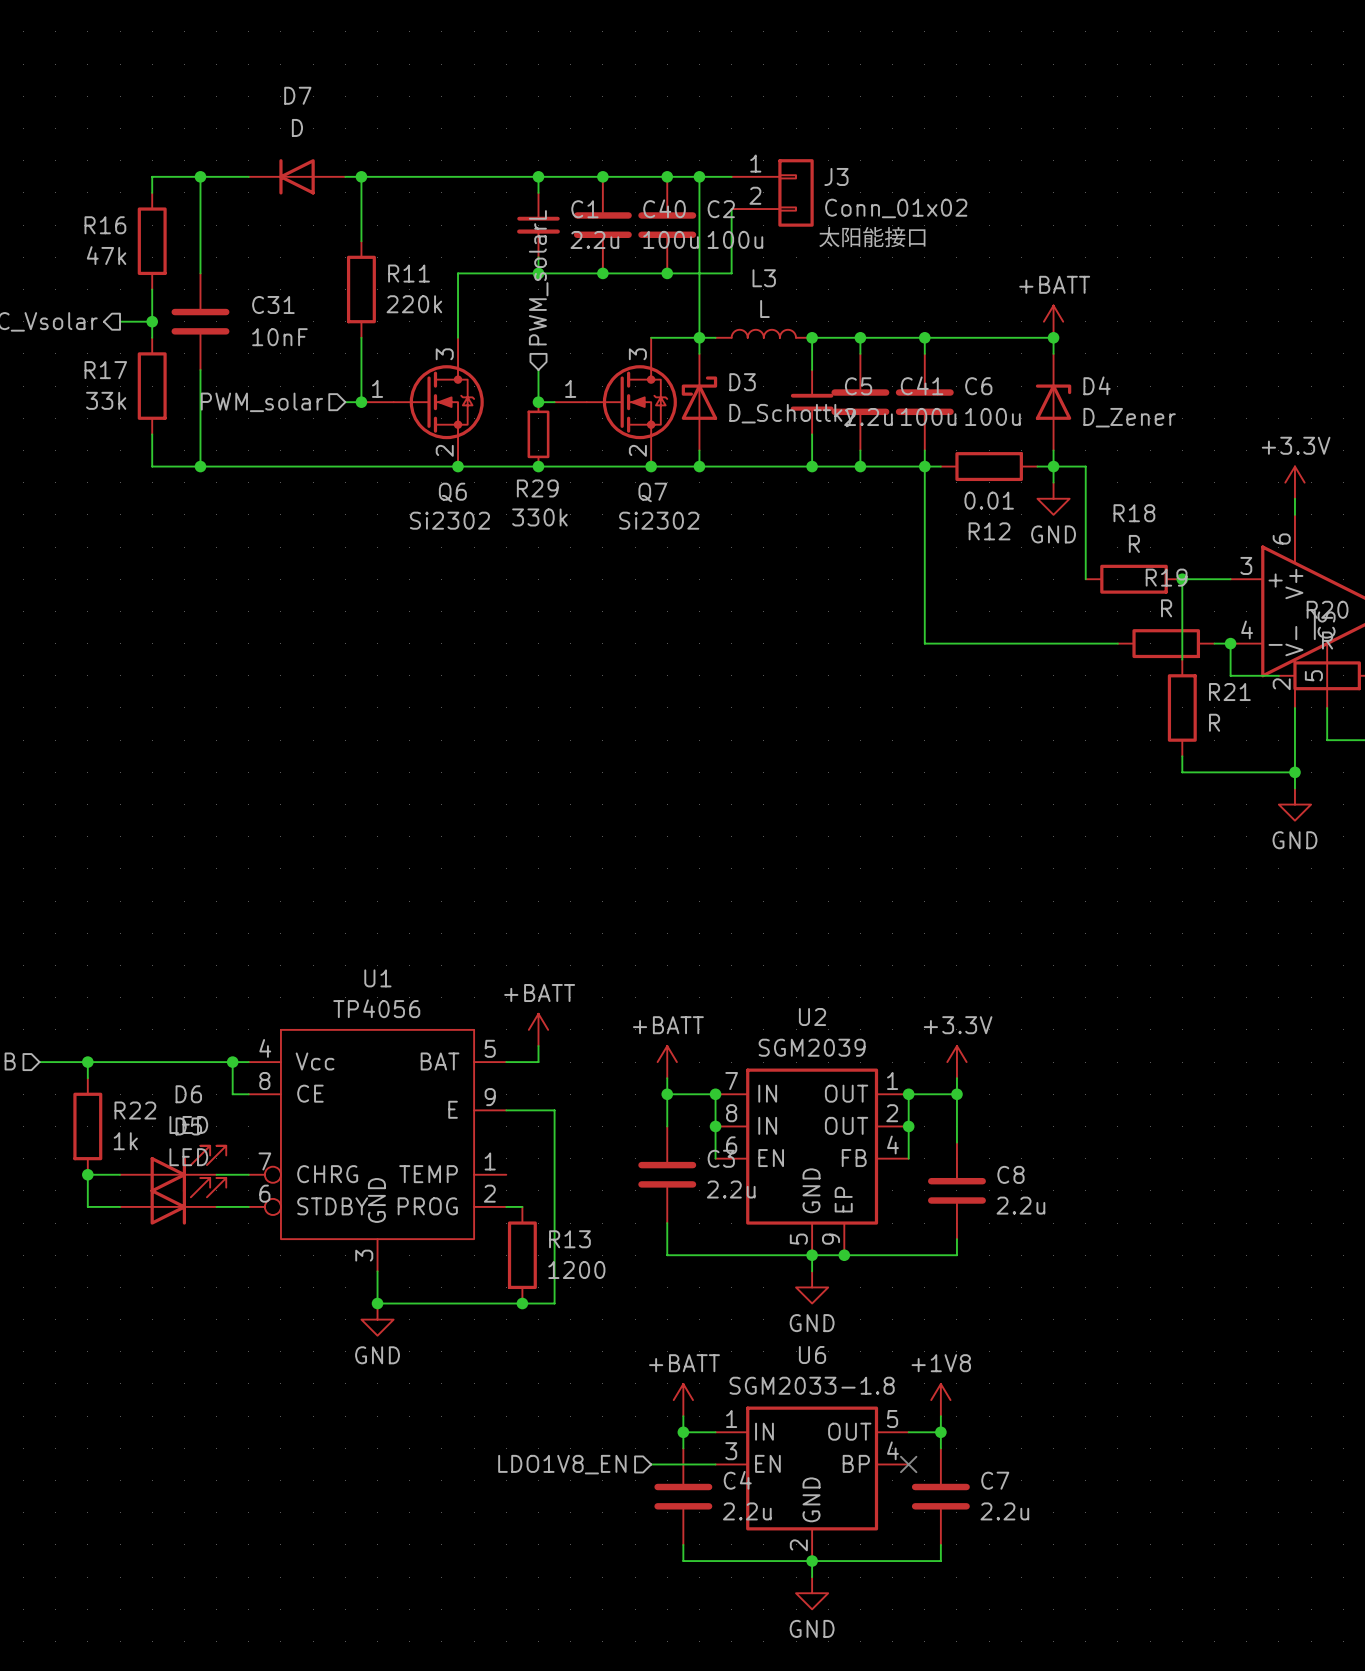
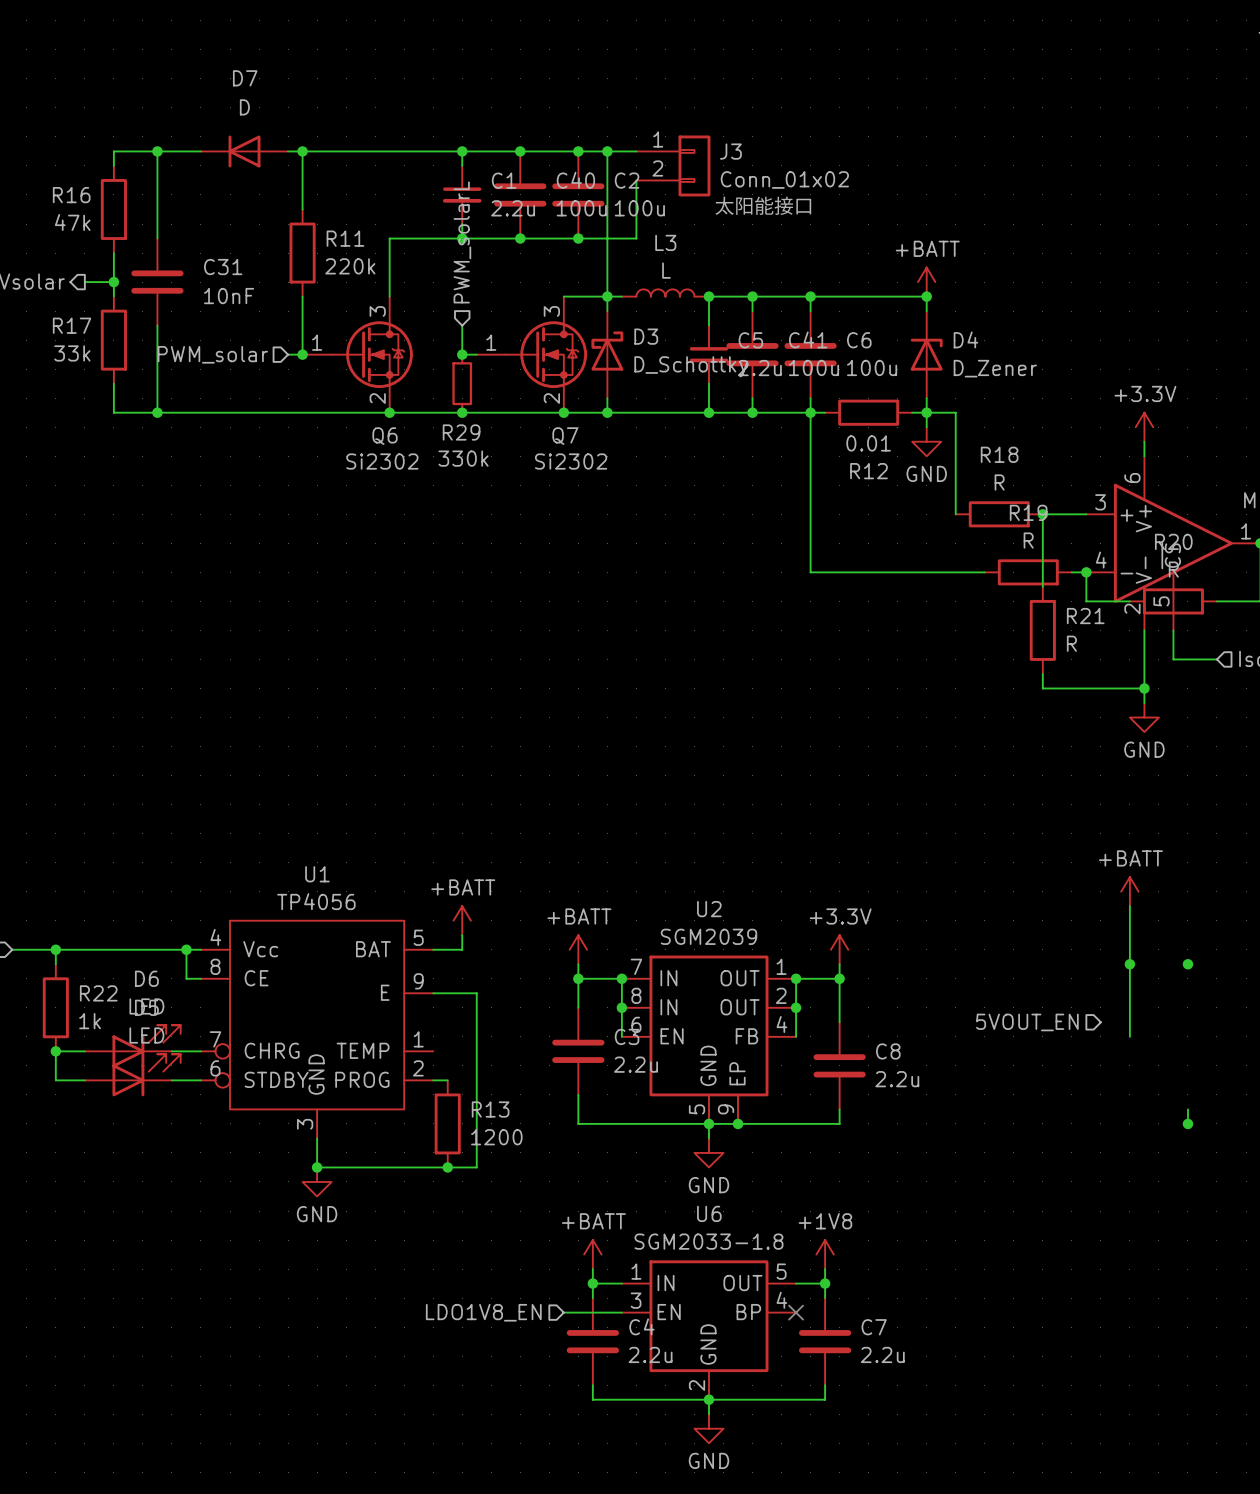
power symbol: none -> +BATT (1129, 891)
wire: none -> (1129, 906) (1129, 1036)
junction: none -> (1129, 964)
junction: none -> (1187, 964)
hierarchical label: none -> 5VOUT_EN (1027, 1022)
wire: none -> (1187, 1109) (1187, 1123)
junction: none -> (1187, 1123)

